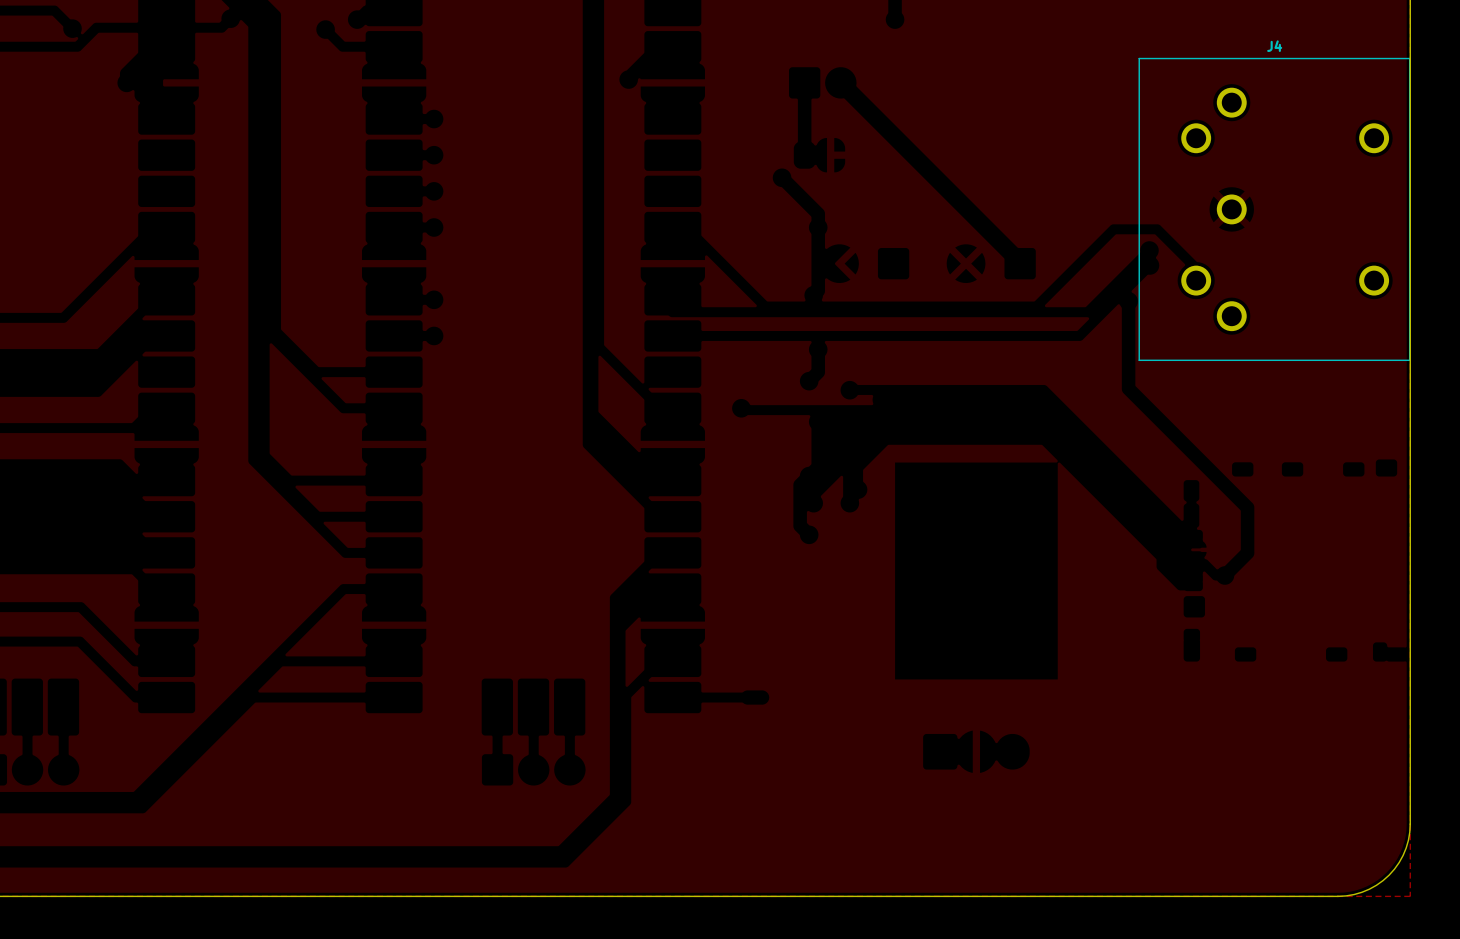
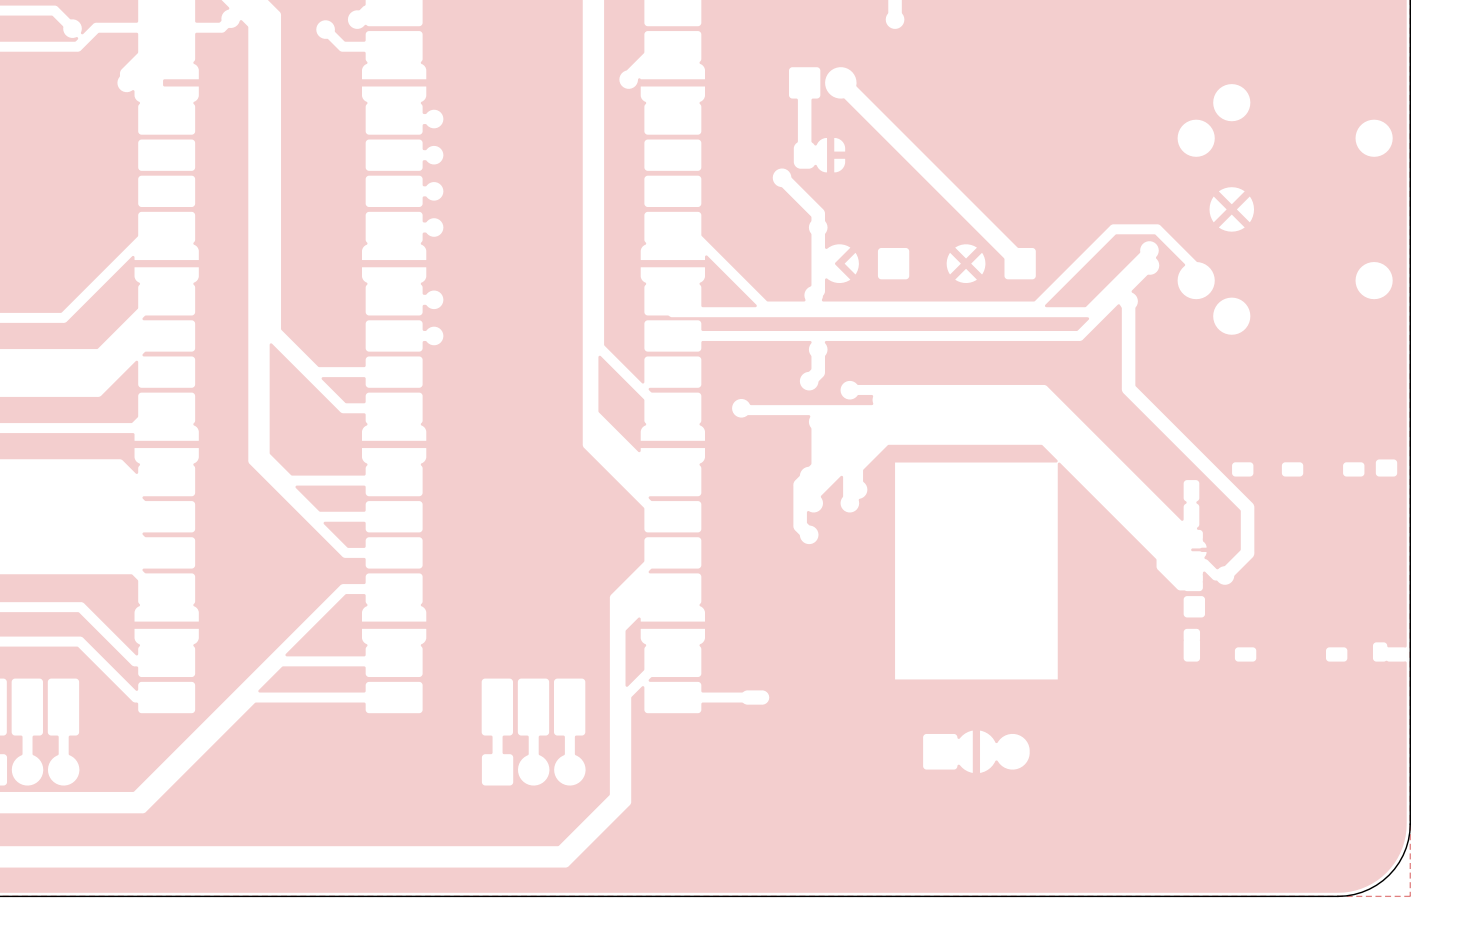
J4: (1274, 209) -> none

